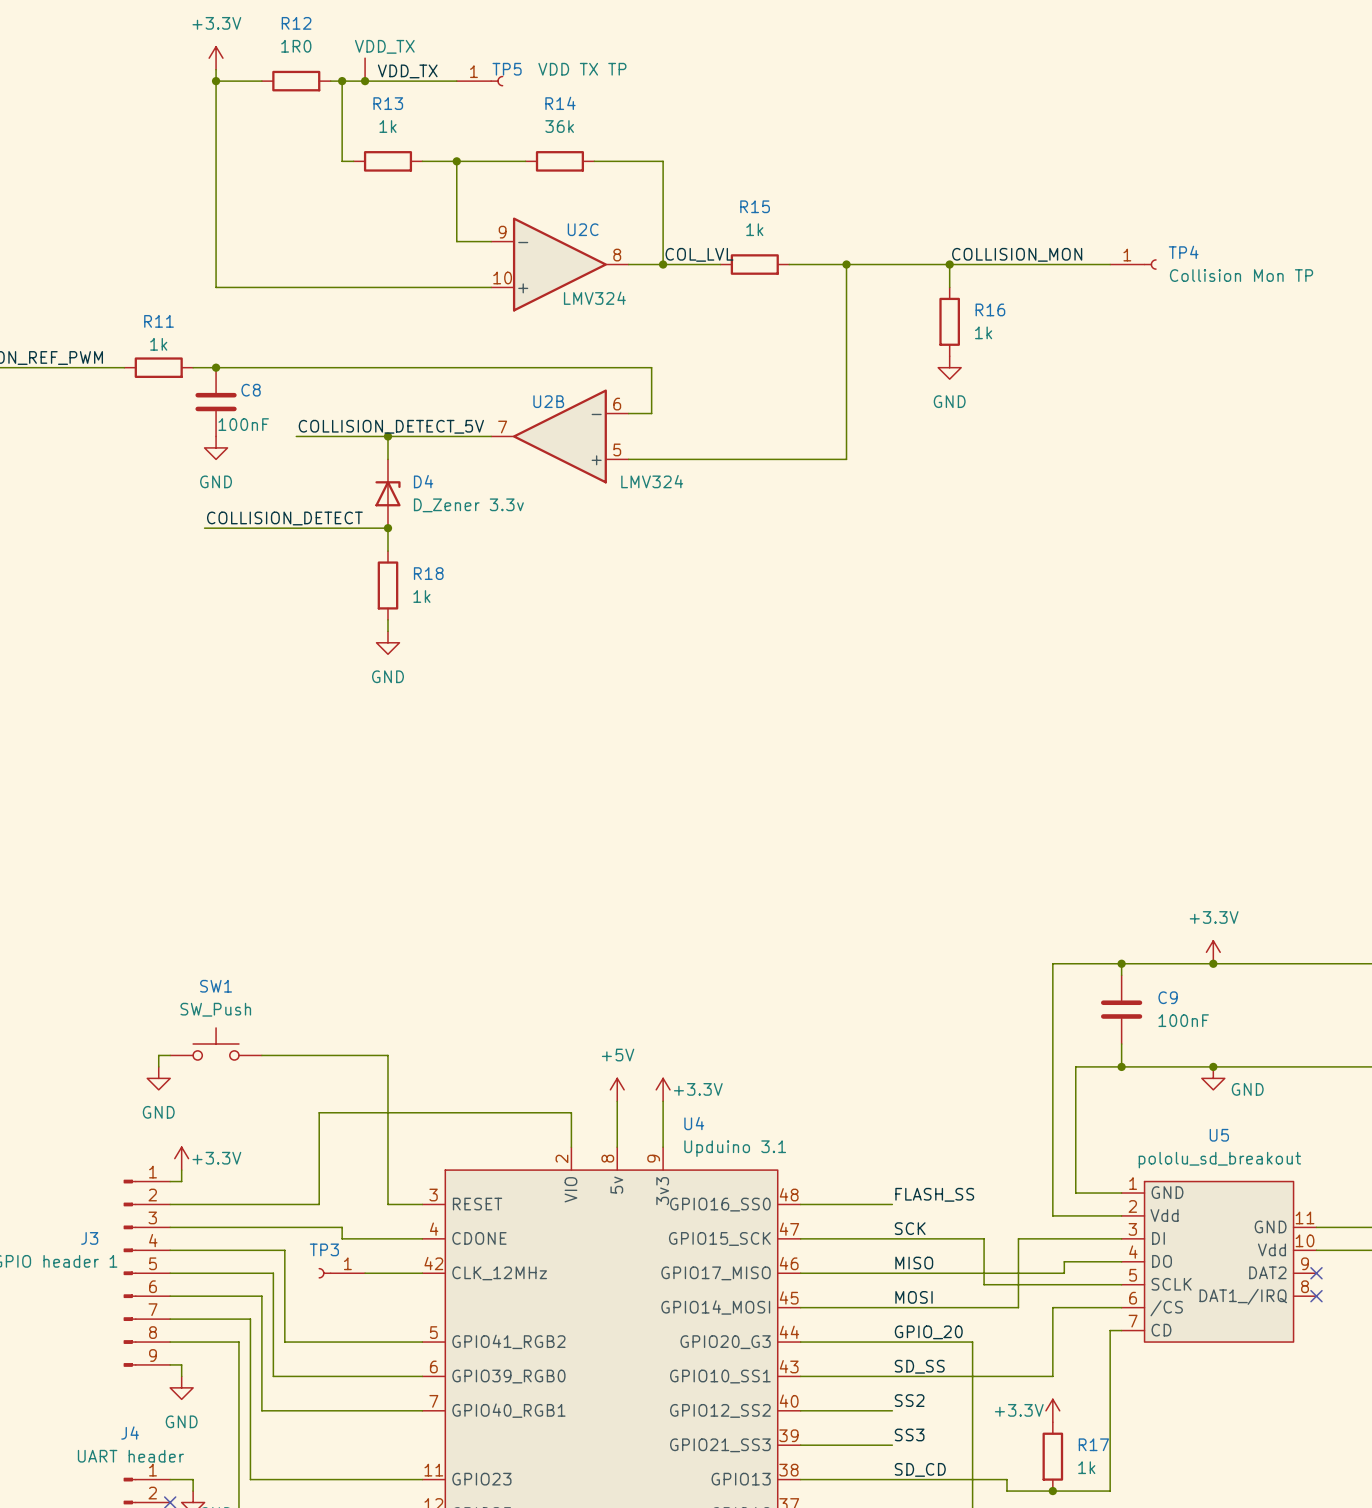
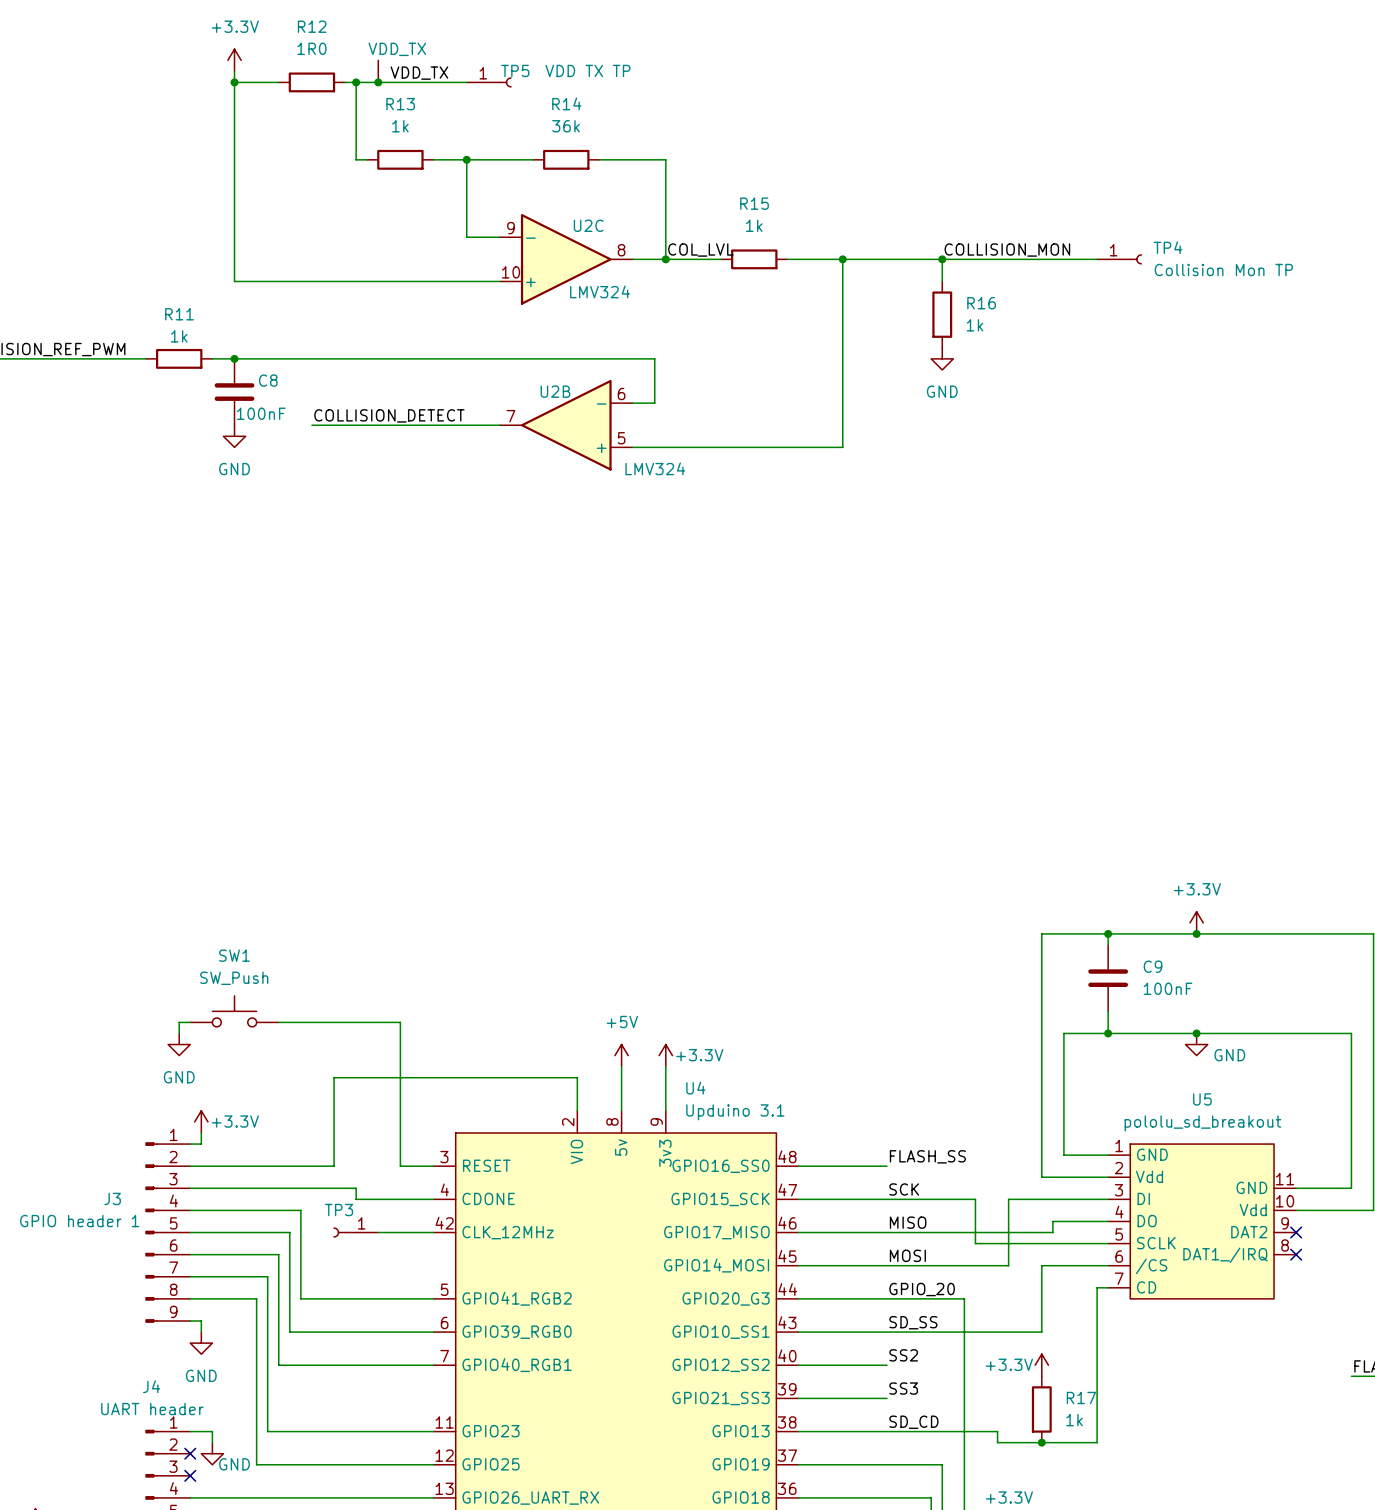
label: COLLISION_DETECT_5V (391, 426) -> COLLISION_DETECT (389, 415)
wire: (387, 436) (387, 459) -> none
junction: (387, 436) -> none
D4: D_Zener 3.3v (387, 493) -> none
label: COLLISION_DETECT (284, 518) -> none
wire: (204, 528) (387, 528) (387, 551) -> none
junction: (387, 528) -> none
R18: 1k (387, 585) -> none
wire: (387, 619) (387, 631) -> none
power symbol: GND (387, 642) -> none

